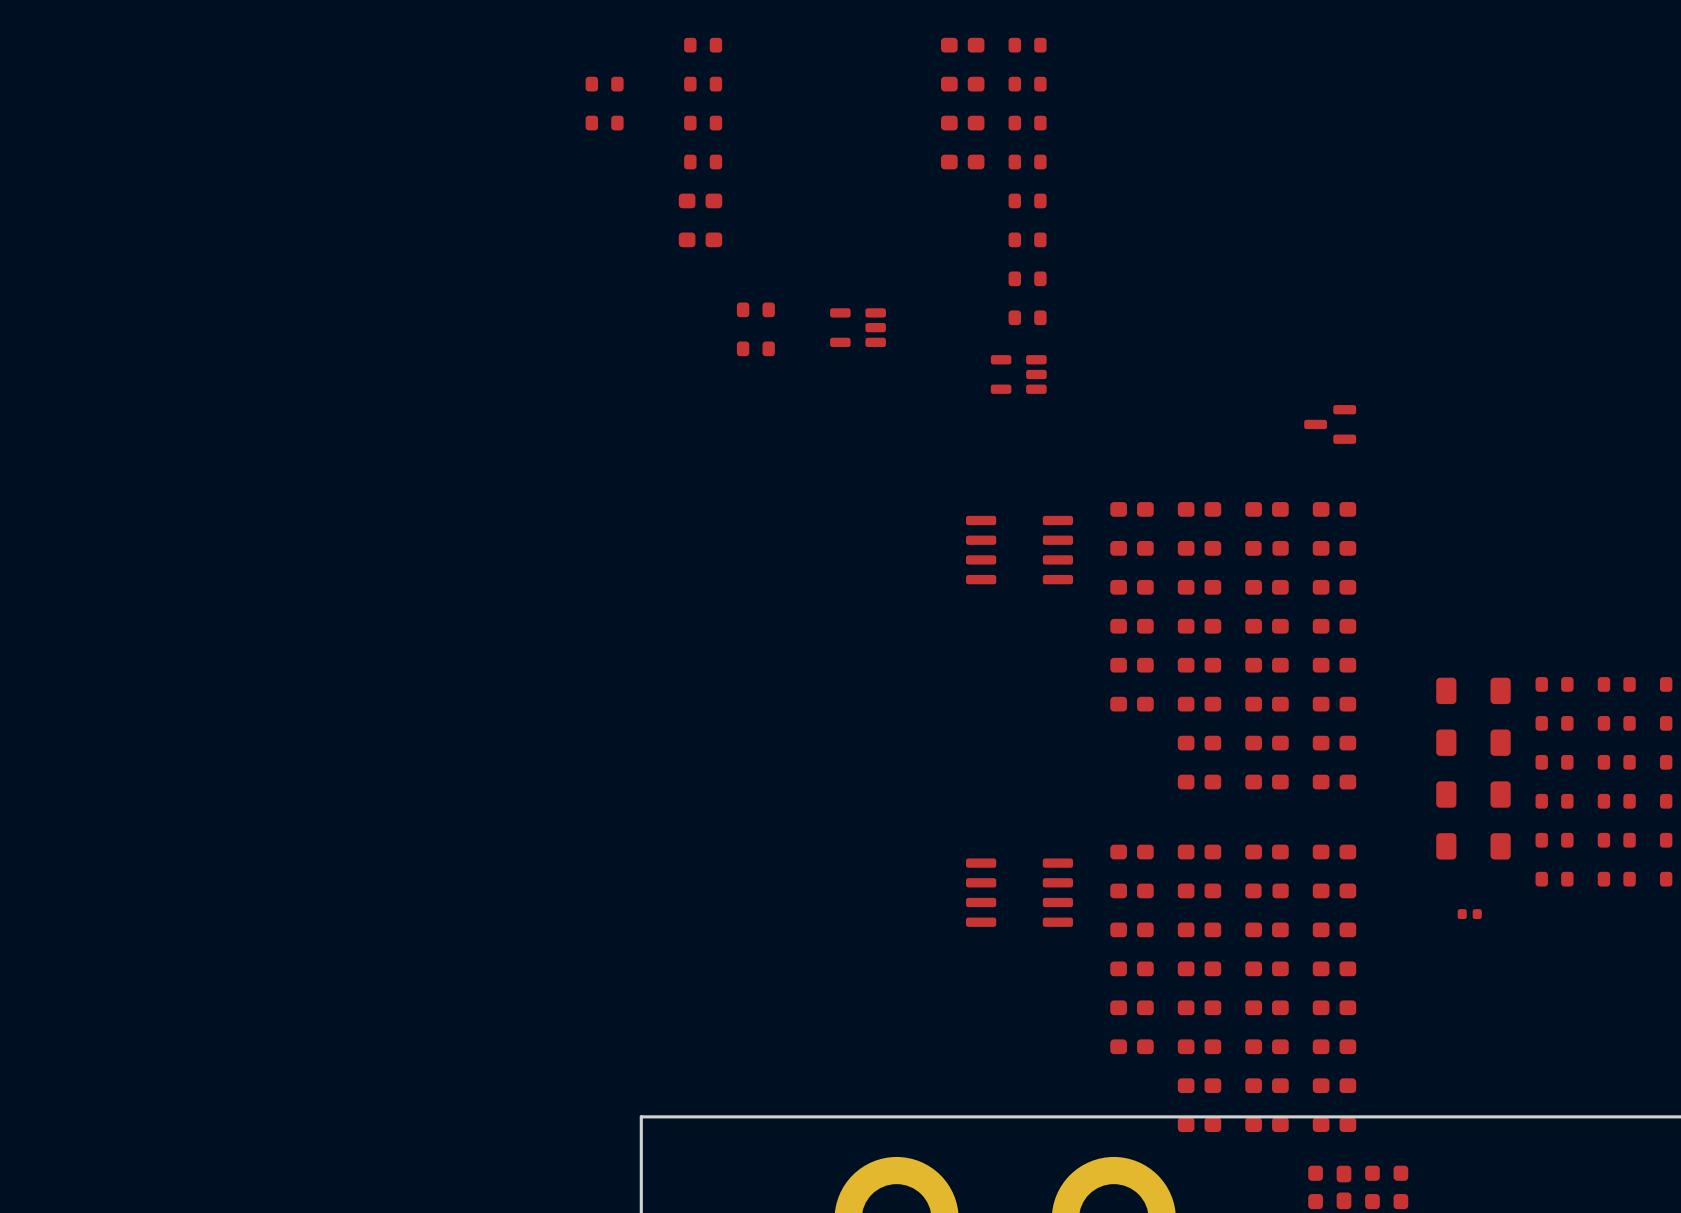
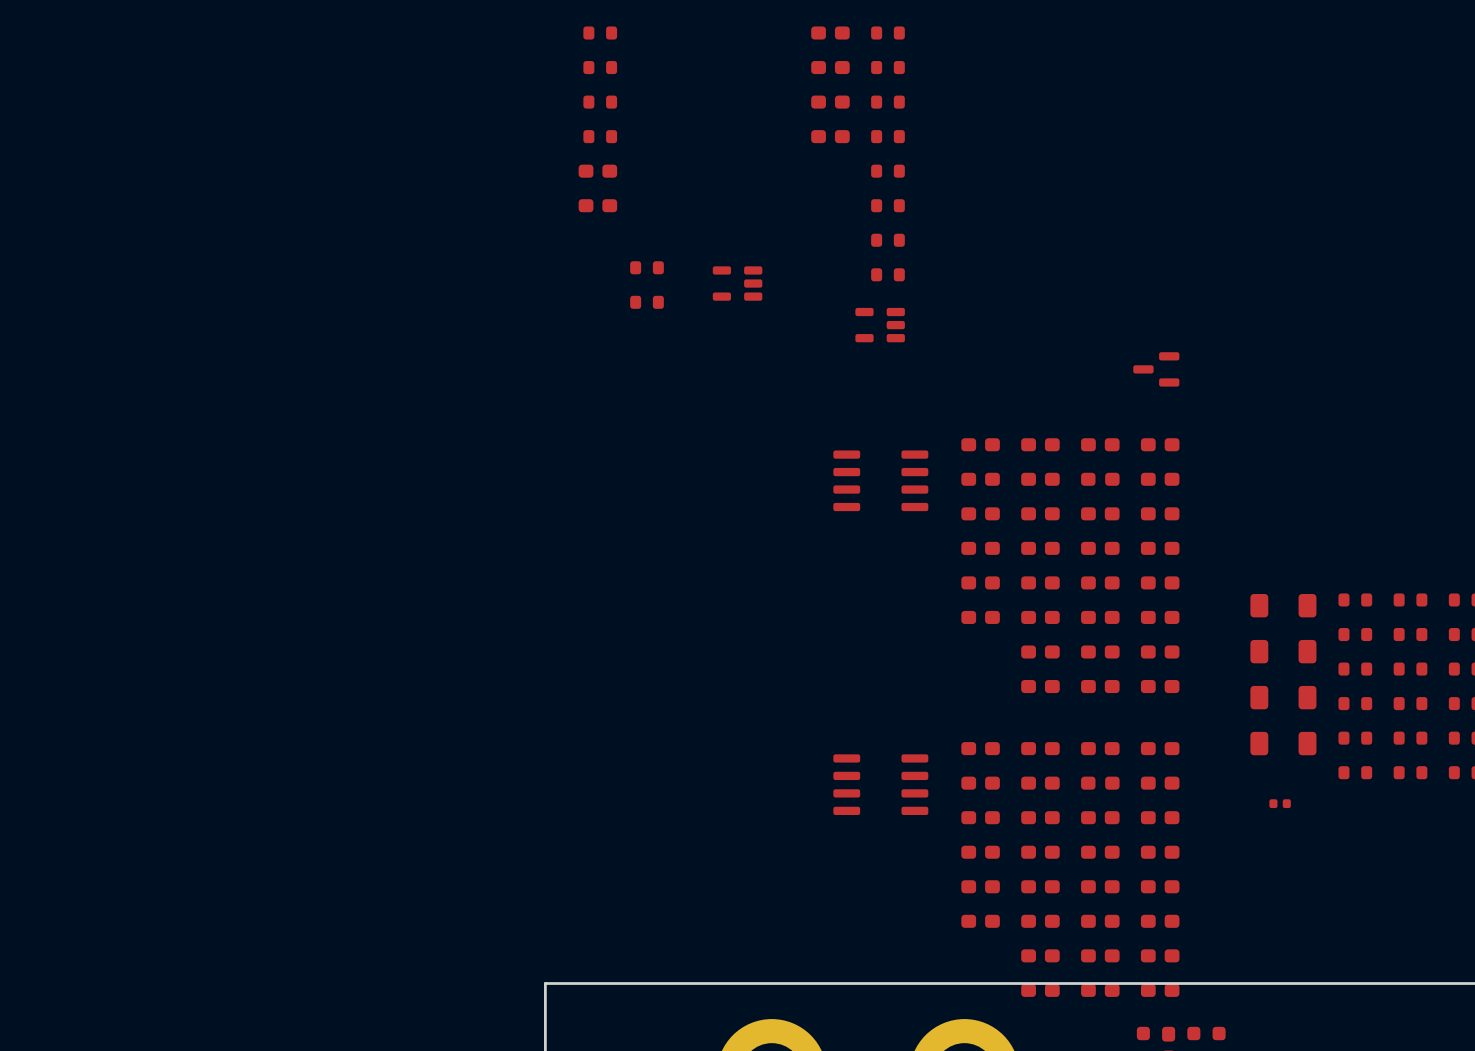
part: (604, 84) -> none
part: (604, 123) -> none

